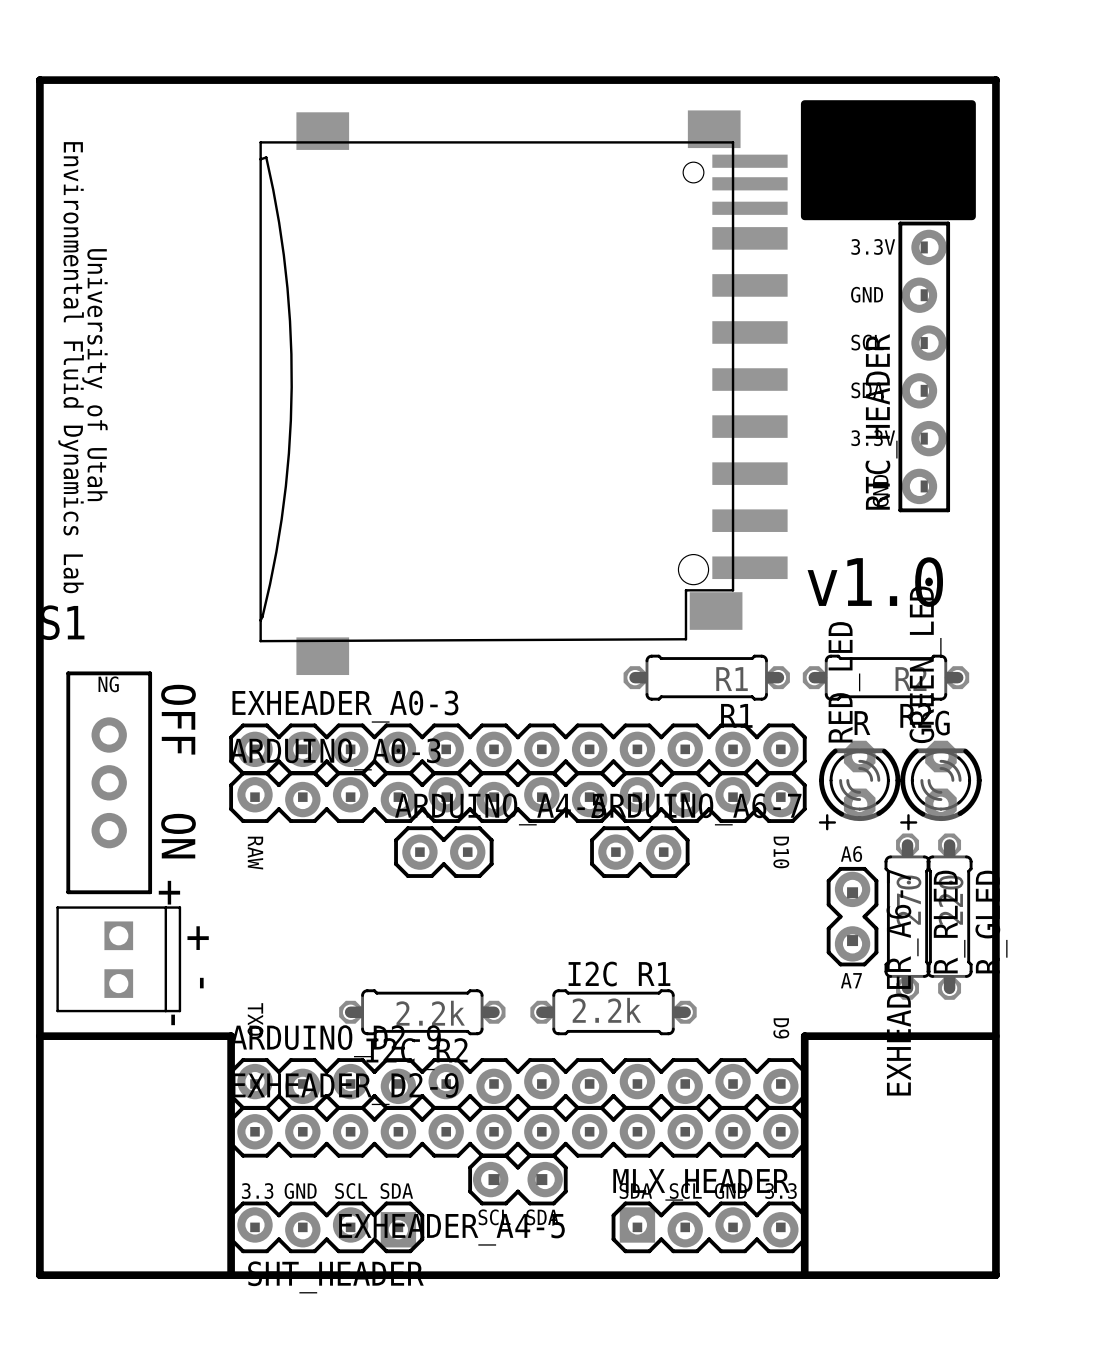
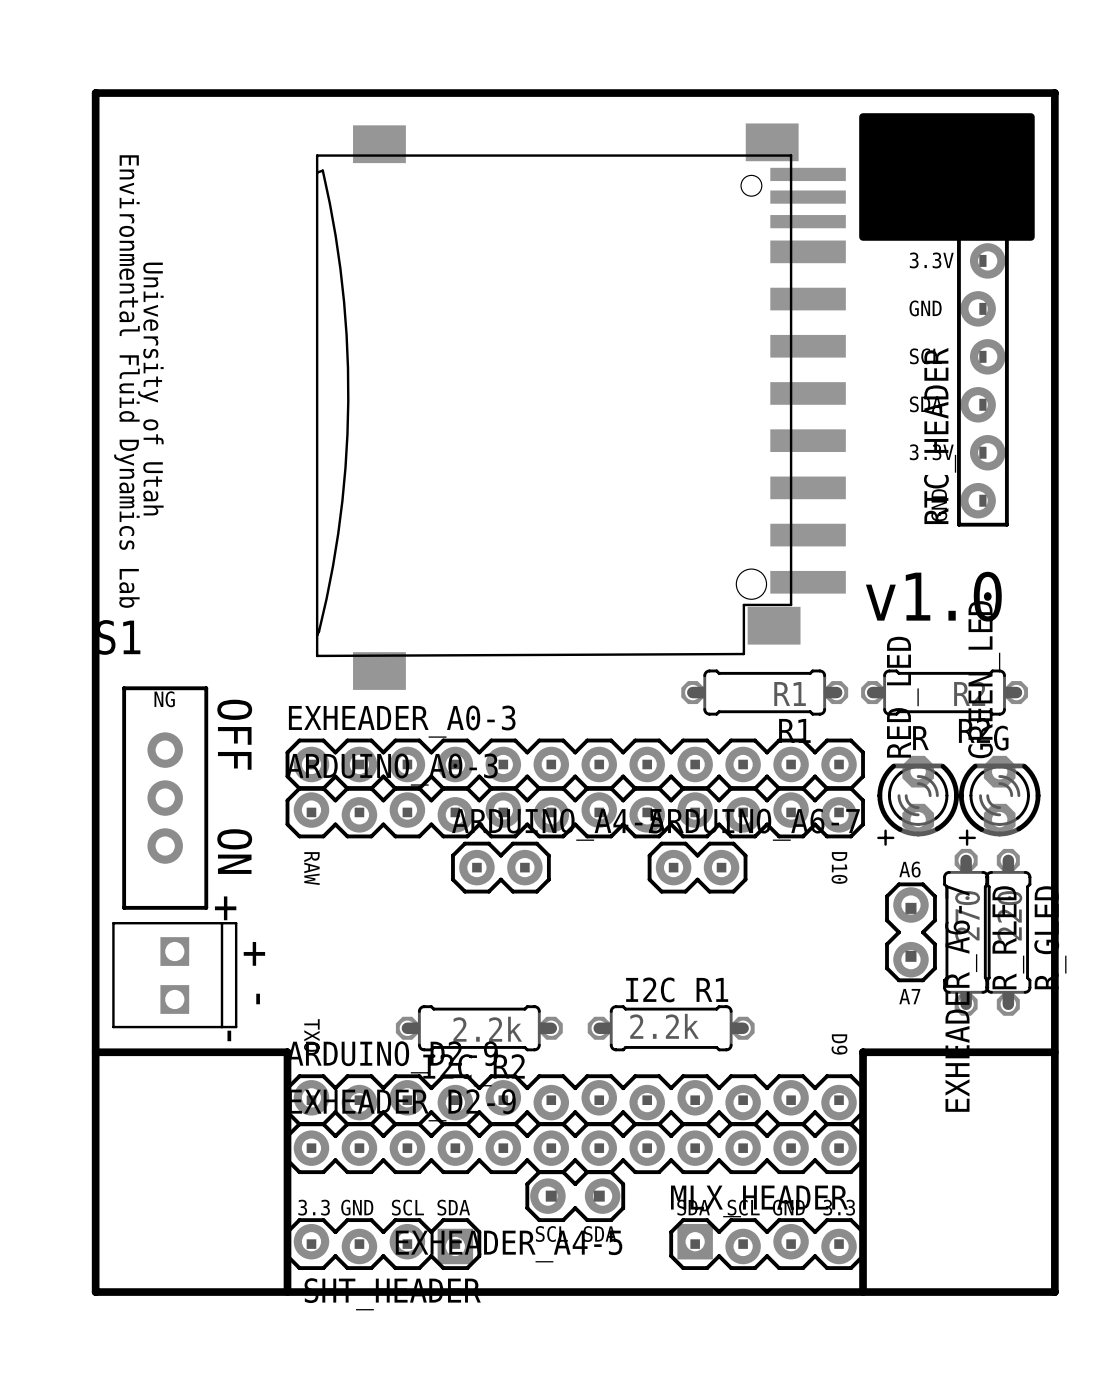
drawing shape: [800, 100, 976, 221] -> [859, 113, 1035, 241]

